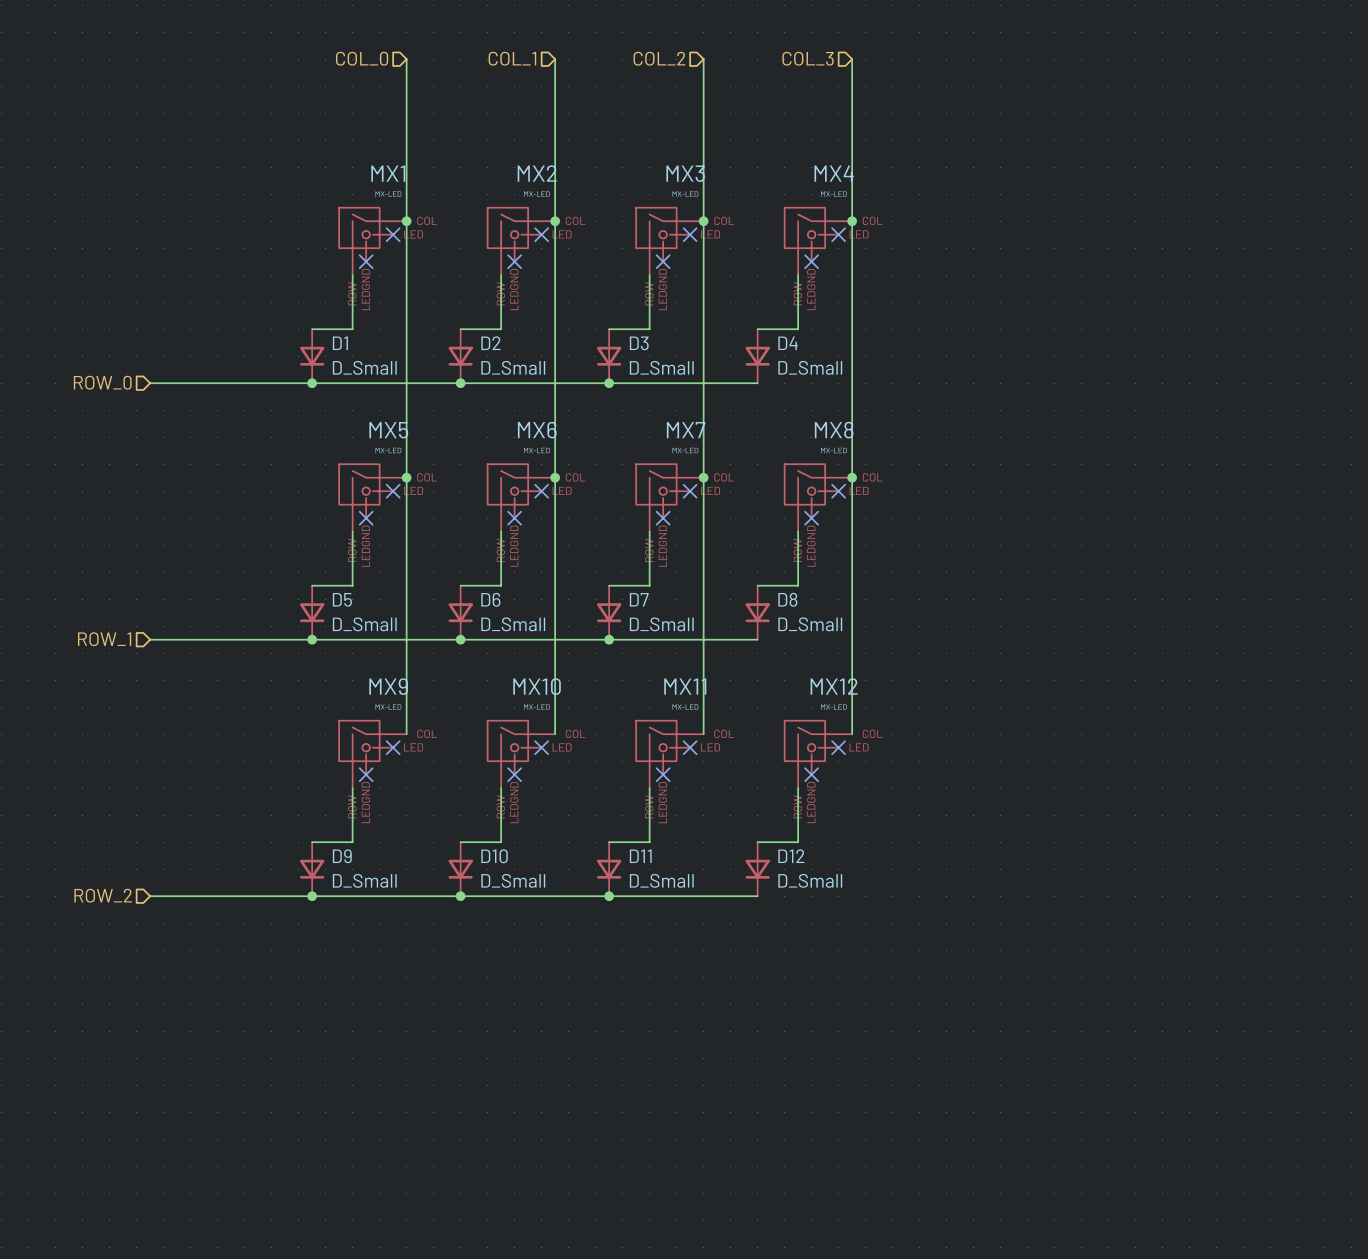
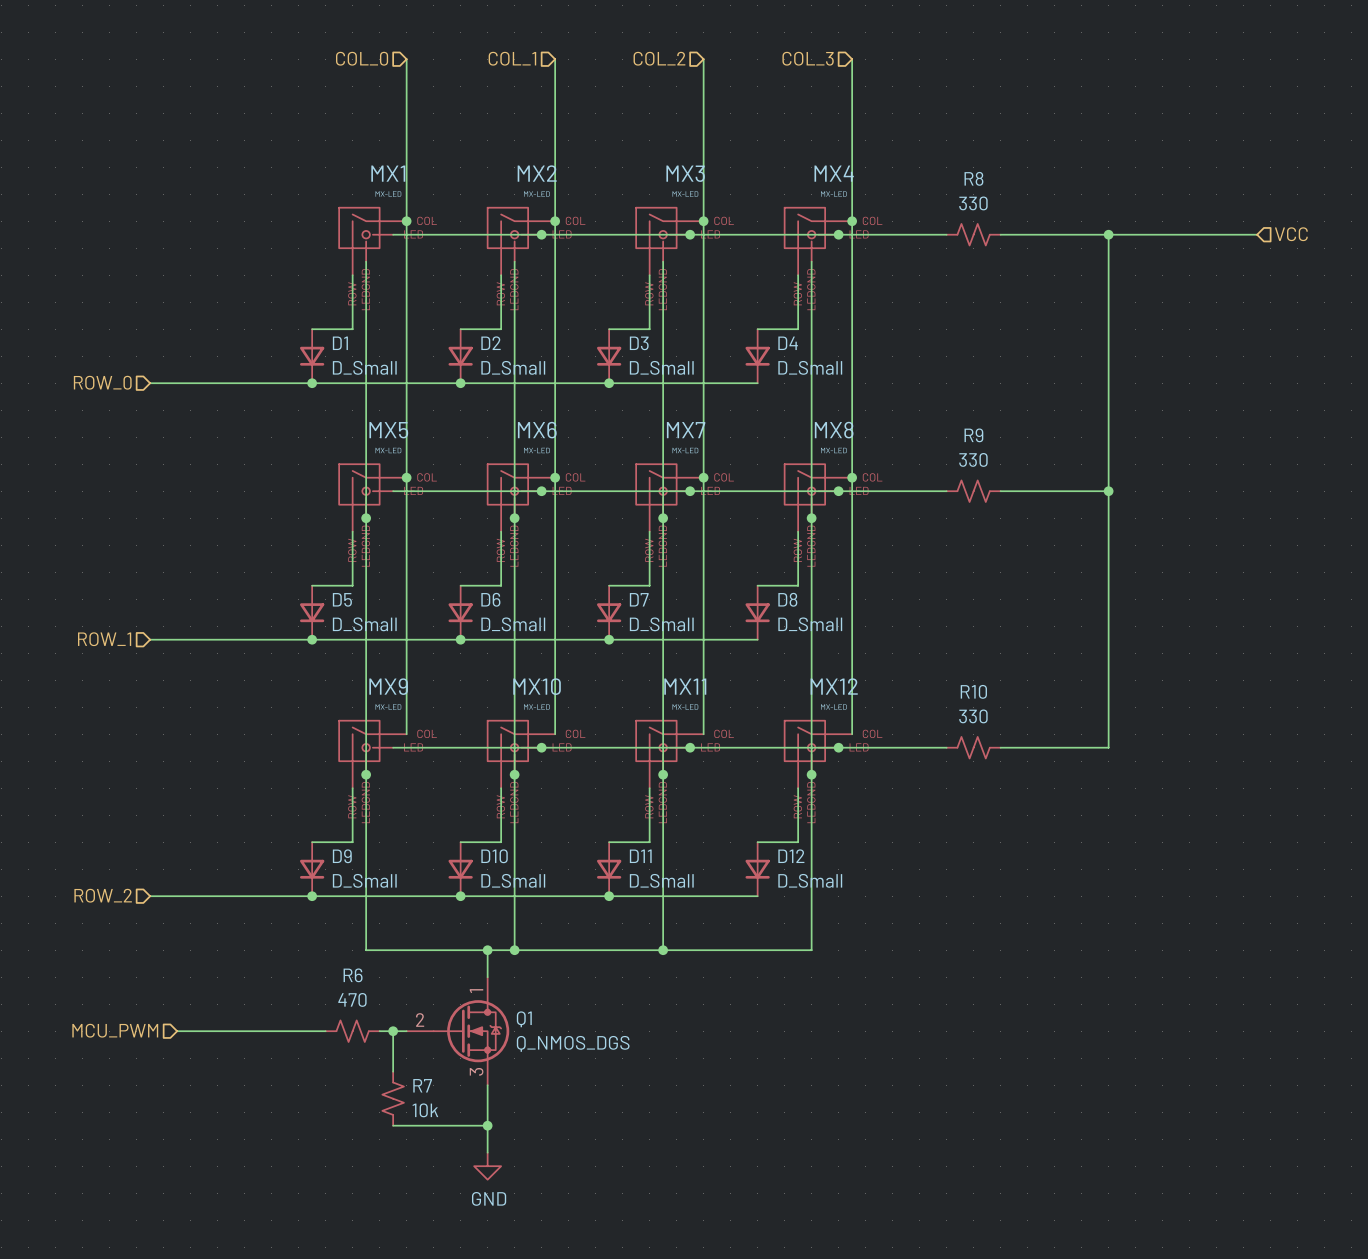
wire: none -> (393, 234) (946, 234)
no-connect mark: (393, 234) -> none
no-connect mark: (541, 234) -> none
junction: none -> (541, 234)
no-connect mark: (690, 234) -> none
junction: none -> (690, 234)
no-connect mark: (838, 234) -> none
junction: none -> (838, 234)
R8: none -> 330 (973, 234)
wire: none -> (1000, 234) (1257, 234)
wire: none -> (1108, 234) (1108, 747) (1000, 747)
junction: none -> (1108, 234)
hierarchical label: none -> VCC (1291, 234)
wire: none -> (366, 261) (366, 950) (811, 950) (811, 261)
no-connect mark: (366, 261) -> none
wire: none -> (514, 261) (514, 950)
no-connect mark: (514, 261) -> none
wire: none -> (663, 261) (663, 950)
no-connect mark: (663, 261) -> none
no-connect mark: (811, 261) -> none
wire: none -> (393, 491) (946, 491)
no-connect mark: (393, 491) -> none
no-connect mark: (541, 491) -> none
junction: none -> (541, 491)
no-connect mark: (690, 491) -> none
junction: none -> (690, 491)
no-connect mark: (838, 491) -> none
junction: none -> (838, 491)
R9: none -> 330 (973, 491)
wire: none -> (1000, 491) (1108, 491)
junction: none -> (1108, 491)
no-connect mark: (366, 518) -> none
junction: none -> (366, 518)
no-connect mark: (514, 518) -> none
junction: none -> (514, 518)
no-connect mark: (663, 518) -> none
junction: none -> (663, 518)
no-connect mark: (811, 518) -> none
junction: none -> (811, 518)
wire: none -> (393, 747) (946, 747)
no-connect mark: (393, 747) -> none
no-connect mark: (541, 747) -> none
junction: none -> (541, 747)
no-connect mark: (690, 747) -> none
junction: none -> (690, 747)
no-connect mark: (838, 747) -> none
junction: none -> (838, 747)
R10: none -> 330 (973, 747)
no-connect mark: (366, 774) -> none
junction: none -> (366, 774)
no-connect mark: (514, 774) -> none
junction: none -> (514, 774)
no-connect mark: (663, 774) -> none
junction: none -> (663, 774)
no-connect mark: (811, 774) -> none
junction: none -> (811, 774)
wire: none -> (487, 950) (487, 977)
junction: none -> (487, 950)
junction: none -> (514, 950)
junction: none -> (663, 950)
hierarchical label: none -> MCU_PWM (115, 1030)
wire: none -> (177, 1031) (325, 1031)
R6: none -> 470 (352, 1031)
wire: none -> (379, 1031) (406, 1031)
wire: none -> (393, 1031) (393, 1071)
junction: none -> (393, 1031)
Q1: none -> Q_NMOS_DGS (457, 1031)
wire: none -> (487, 1085) (487, 1152)
R7: none -> 10k (393, 1098)
wire: none -> (393, 1125) (487, 1125)
junction: none -> (487, 1125)
power symbol: none -> GND (487, 1166)

